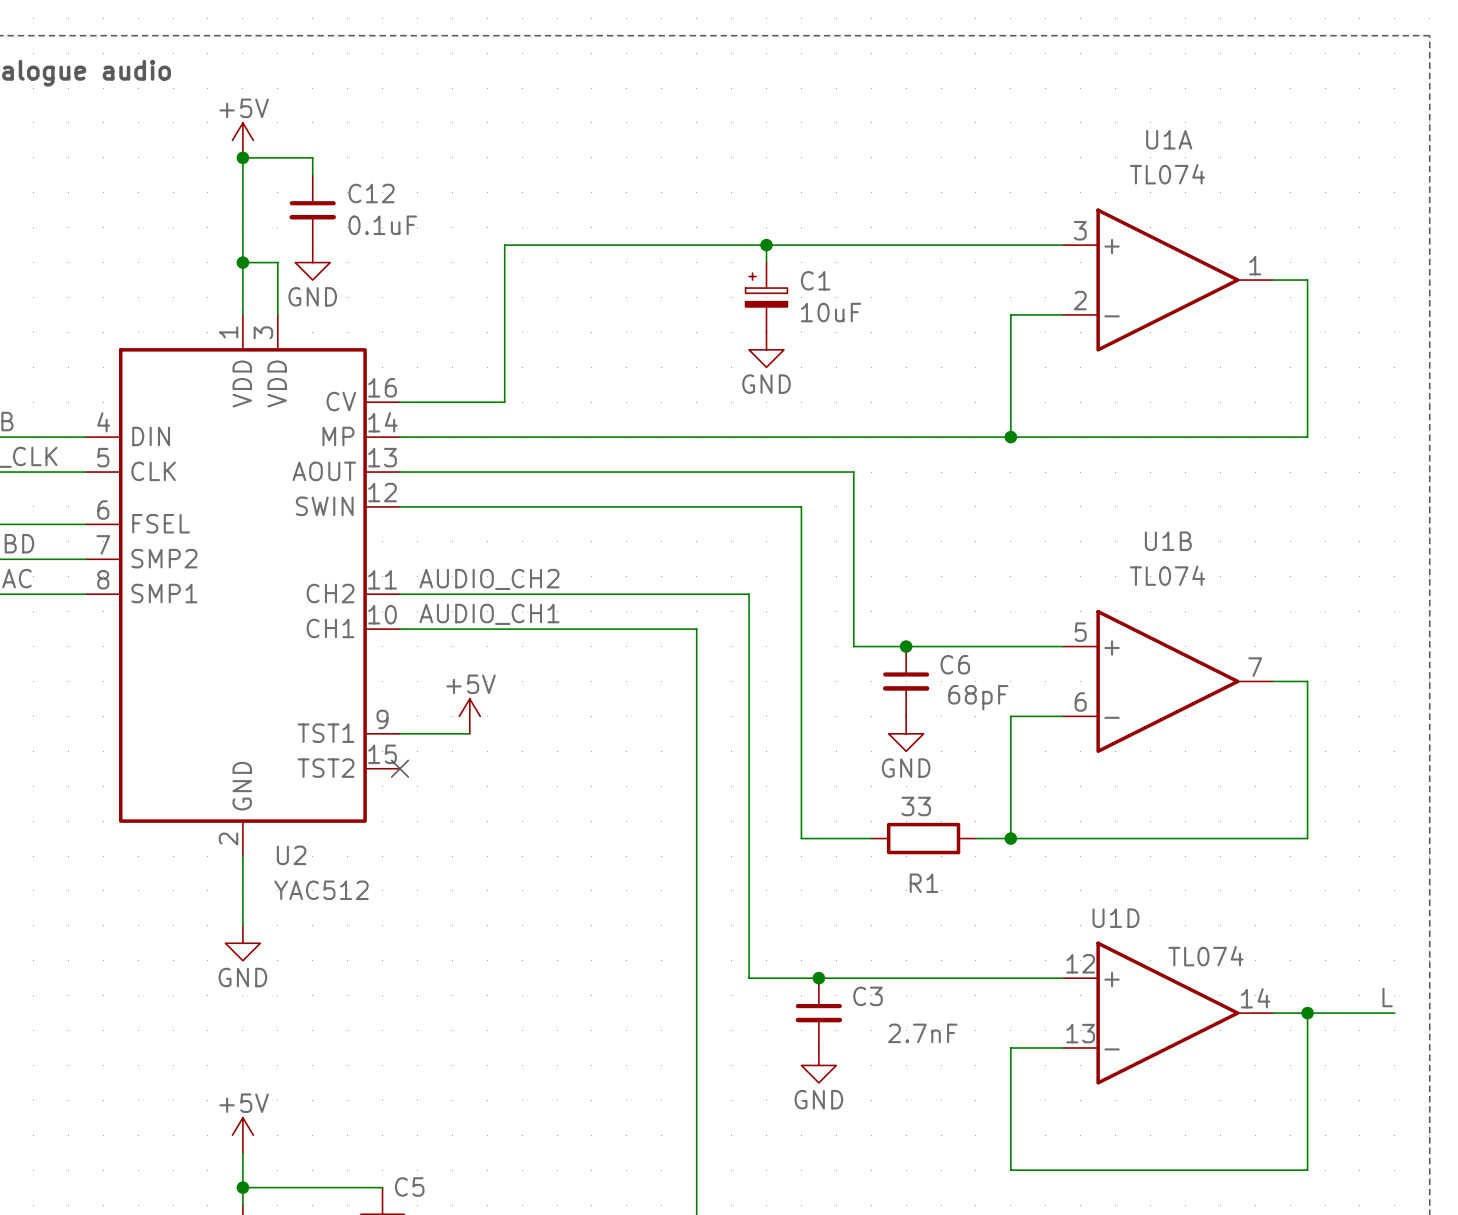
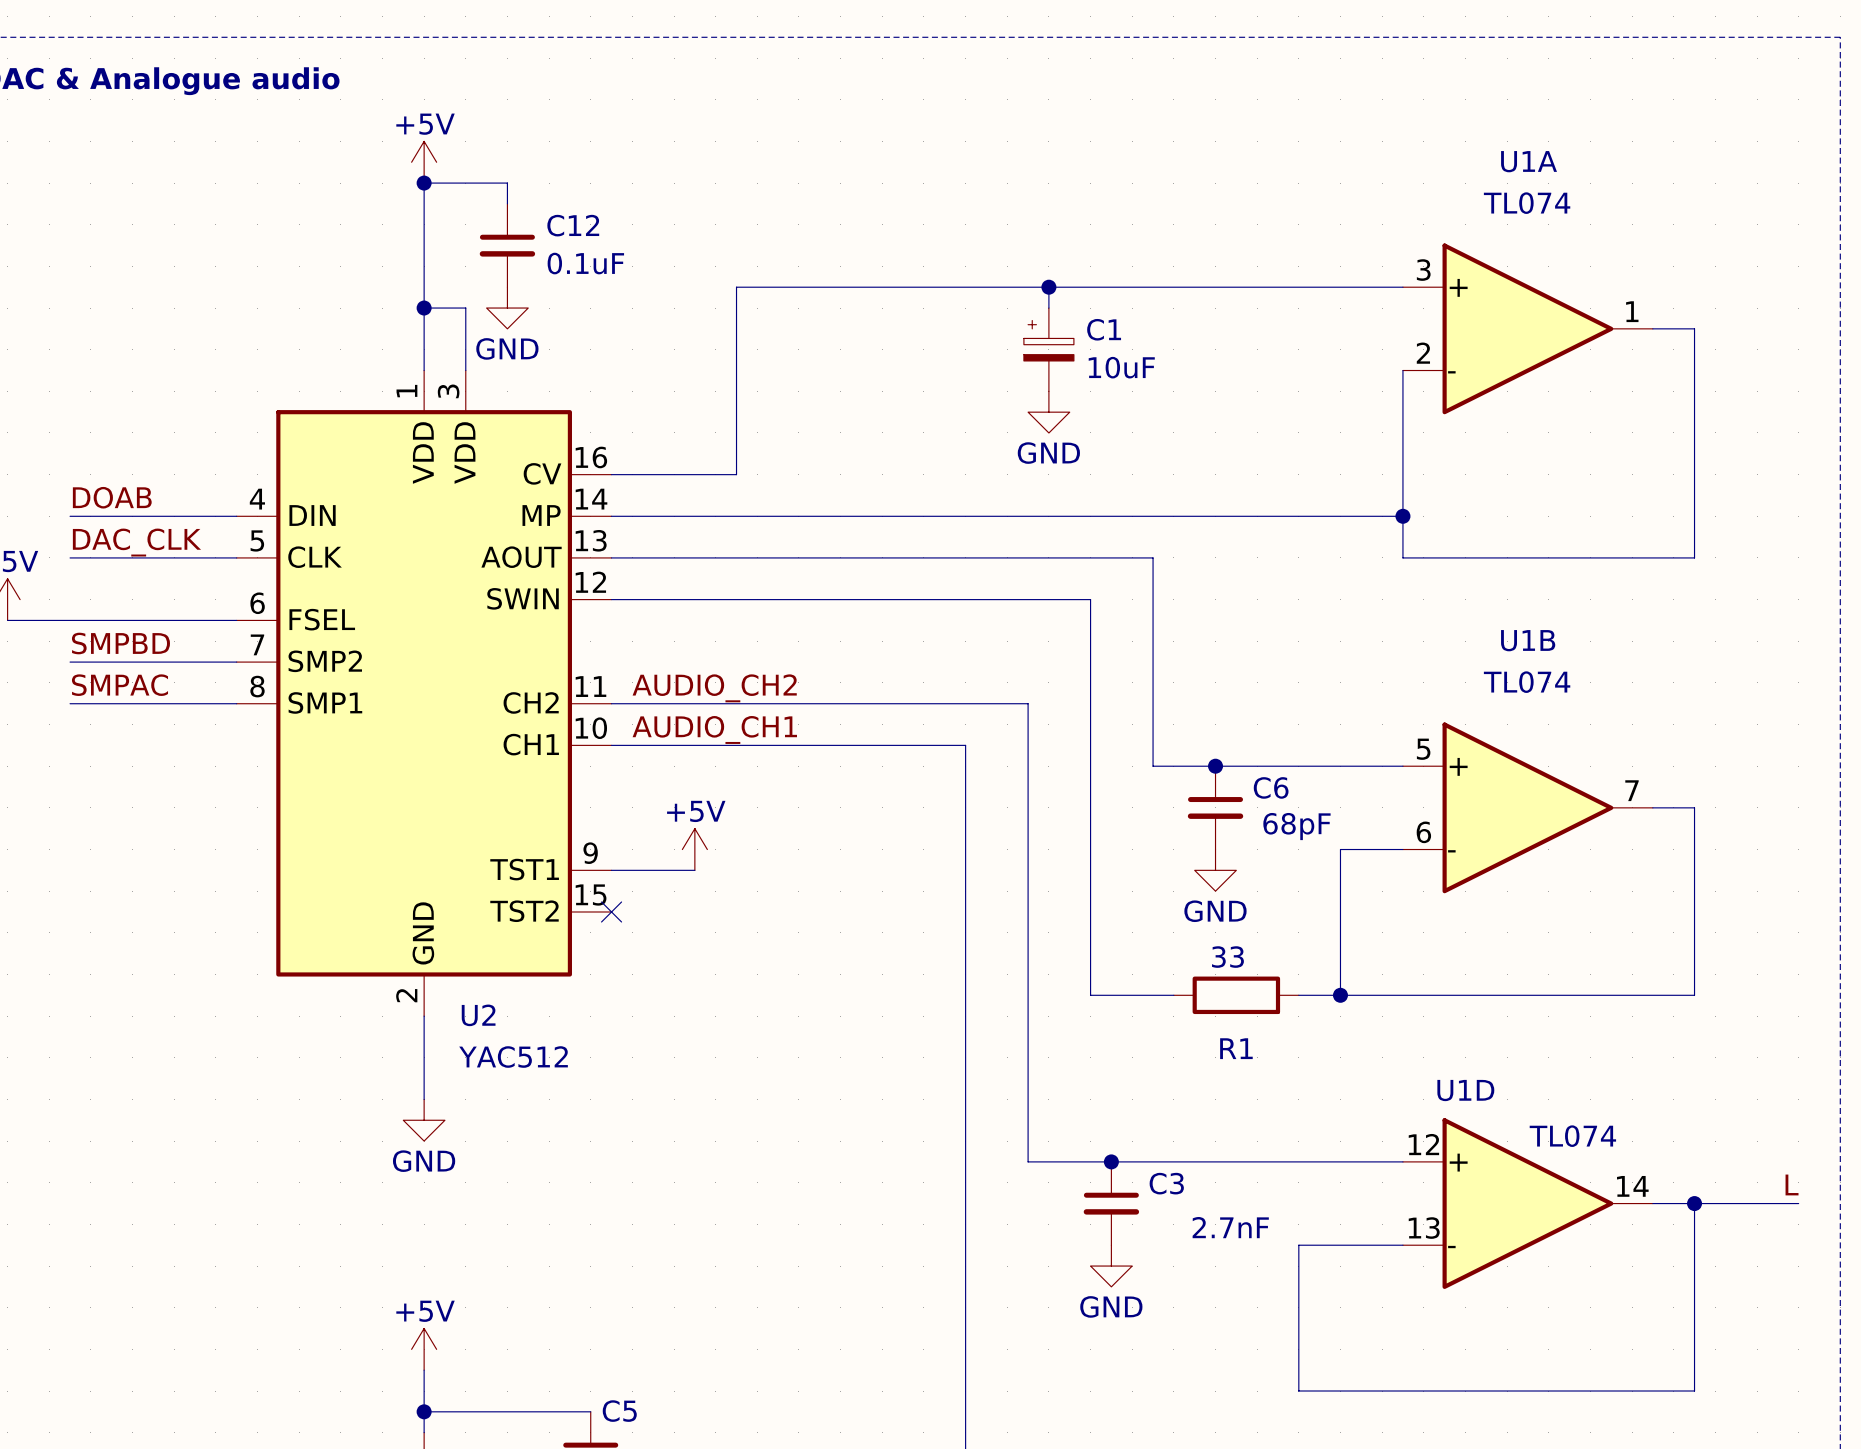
wire: (1063, 314) (1010, 314) (1010, 437) -> none
junction position: (1010, 437) -> (1402, 516)
wire: (1063, 437) (1307, 437) -> (1402, 370) (1402, 557) (1694, 557) (1694, 516)
wire: (1010, 1047) (1010, 1170) -> (1340, 1245) (1298, 1245) (1298, 1391) (1340, 1391)

